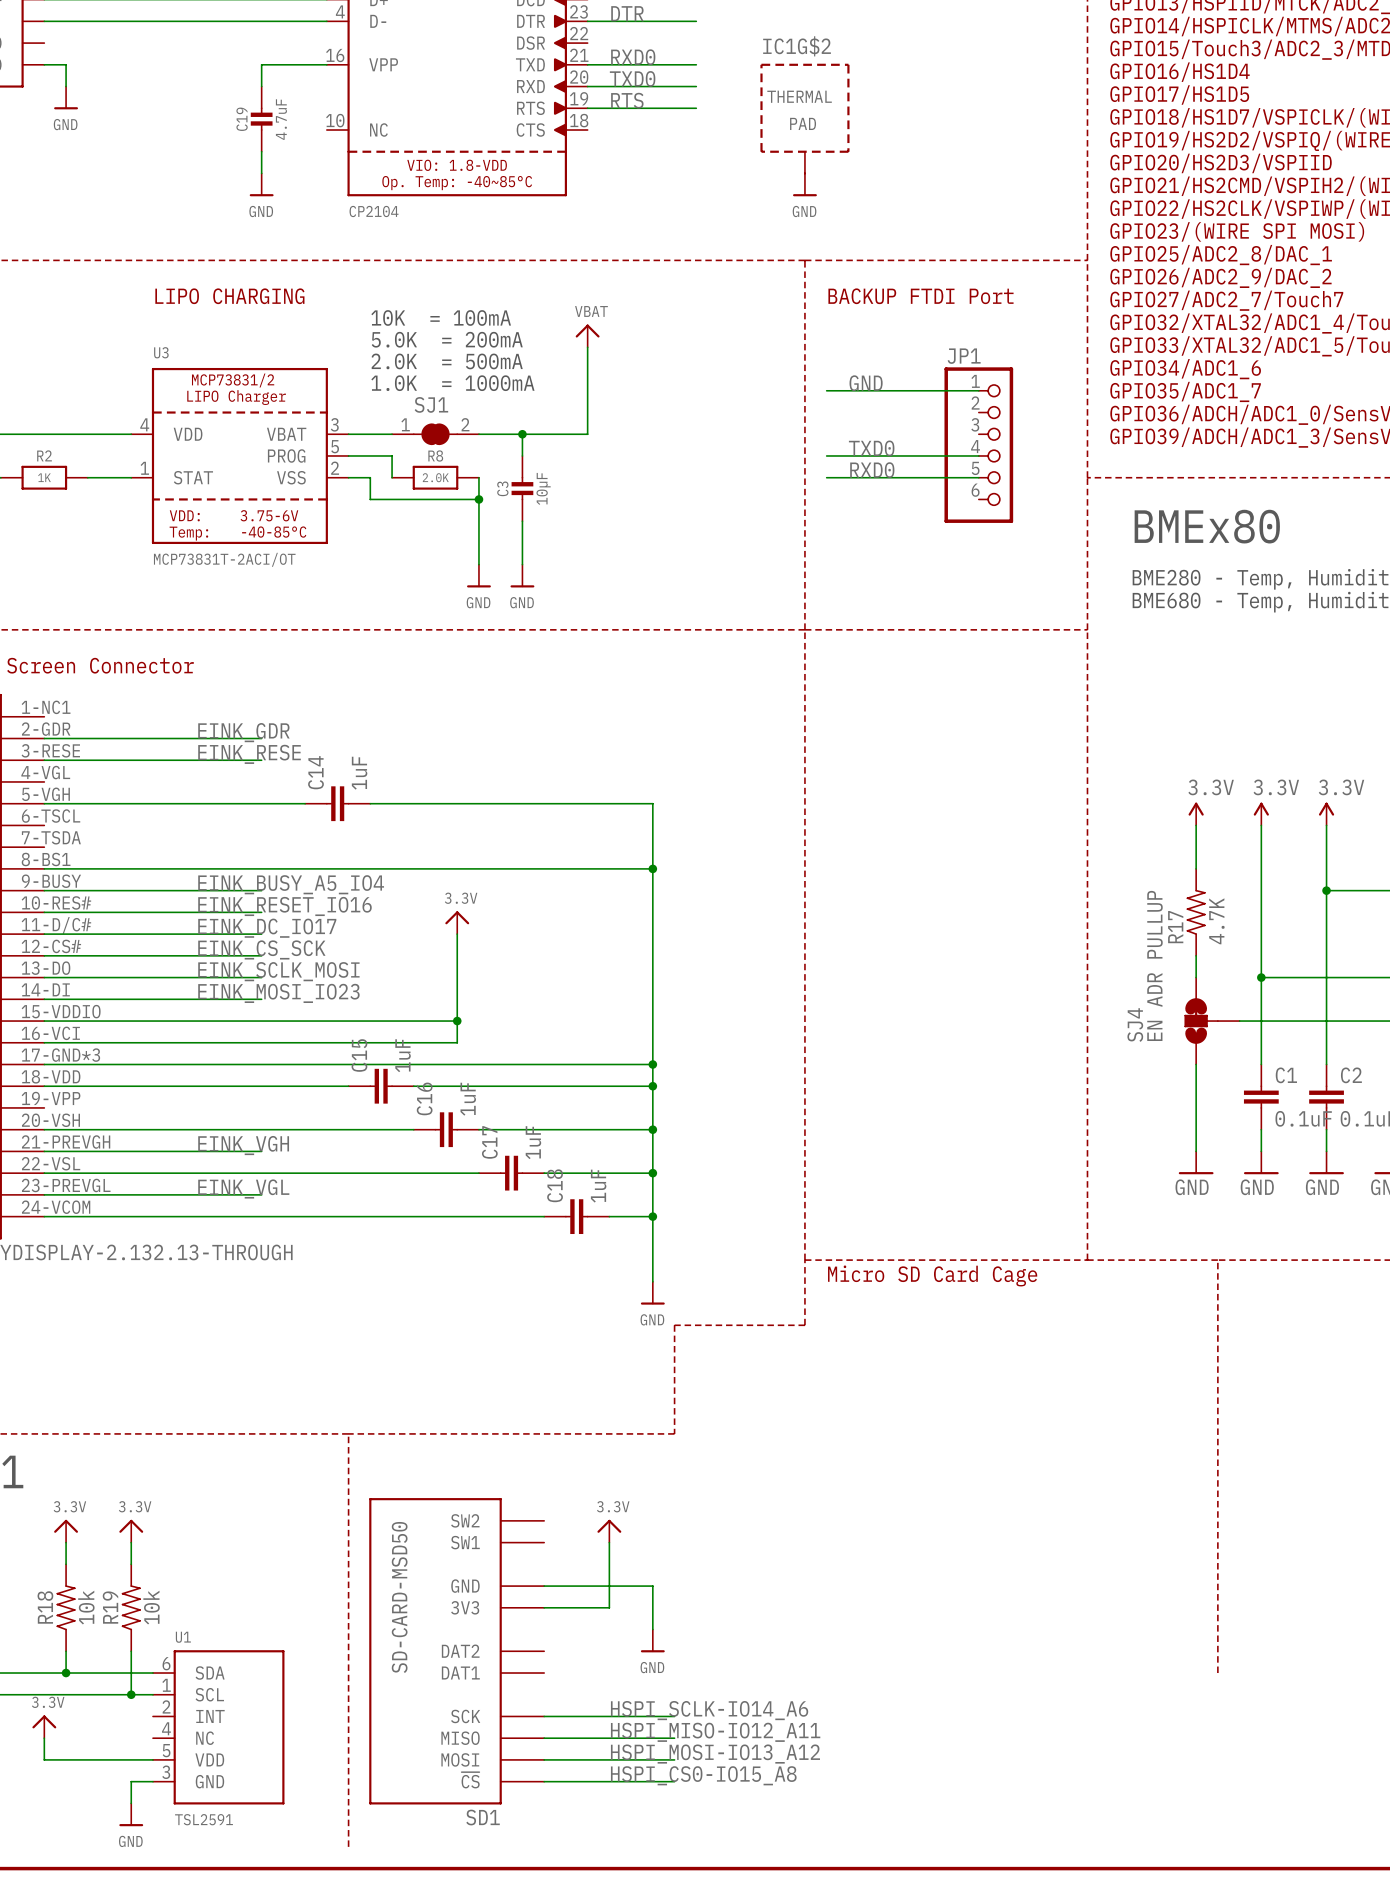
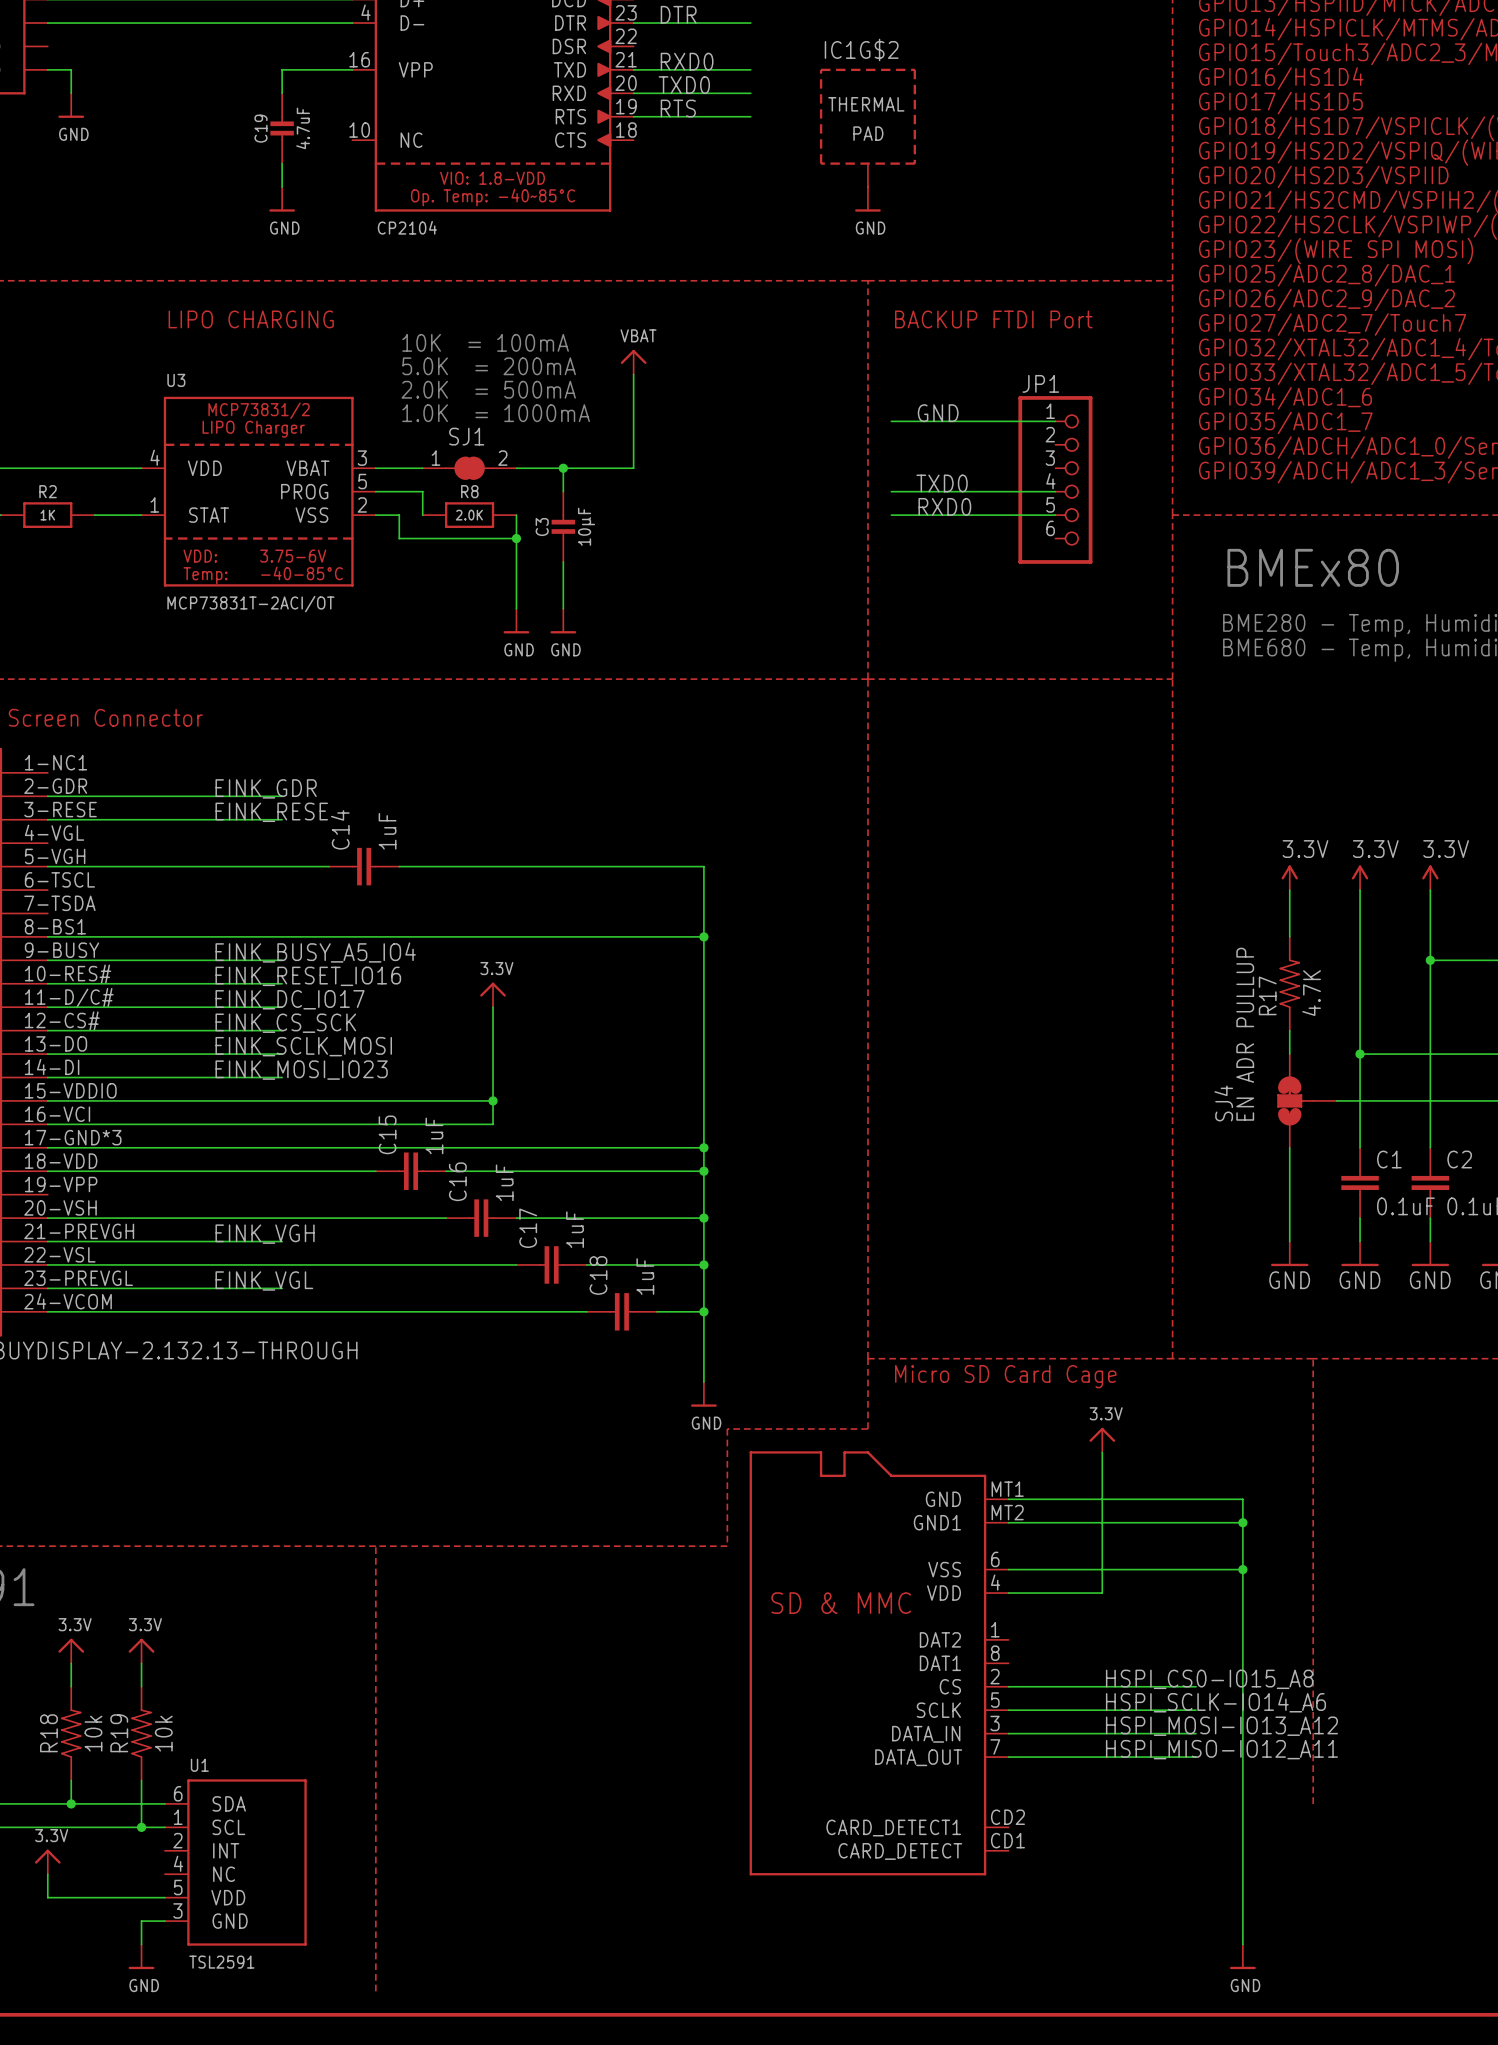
power symbol: none -> 3.3V (1102, 1440)
wire: none -> (1102, 1452) (1102, 1593) (1008, 1593)
wire: none -> (1008, 1499) (1242, 1499) (1242, 1944)
wire: none -> (1008, 1522) (1242, 1522)
junction: none -> (1242, 1522)
wire: none -> (1008, 1569) (1242, 1569)
junction: none -> (1242, 1569)
power symbol: 3.3V (609, 1531) -> none
wire: (609, 1542) (609, 1607) (544, 1607) -> none
part: none -> (879, 1663)
label: none -> HSPI_CS0-IO15_A8 (1209, 1679)
wire: none -> (1008, 1686) (1196, 1686)
label: none -> HSPI_SCLK-IO14_A6 (1215, 1702)
wire: (544, 1586) (652, 1586) (652, 1629) -> none
wire: none -> (1008, 1710) (1196, 1710)
label: none -> HSPI_MOSI-IO13_A12 (1221, 1726)
wire: none -> (1008, 1733) (1196, 1733)
label: none -> HSPI_MISO-IO12_A11 (1221, 1749)
wire: none -> (1008, 1757) (1196, 1757)
power symbol: GND (652, 1640) -> none
SD1: SD-CARD-MSD50 (456, 1651) -> none
label: HSPI_SCLK-IO14_A6 (709, 1710) -> none
wire: (544, 1716) (674, 1716) -> none
label: HSPI_MISO-IO12_A11 (715, 1732) -> none
wire: (544, 1738) (674, 1738) -> none
label: HSPI_MOSI-IO13_A12 (715, 1754) -> none
wire: (544, 1759) (674, 1759) -> none
label: HSPI_CS0-IO15_A8 (703, 1775) -> none
wire: (544, 1781) (674, 1781) -> none
power symbol: none -> GND (1242, 1956)

